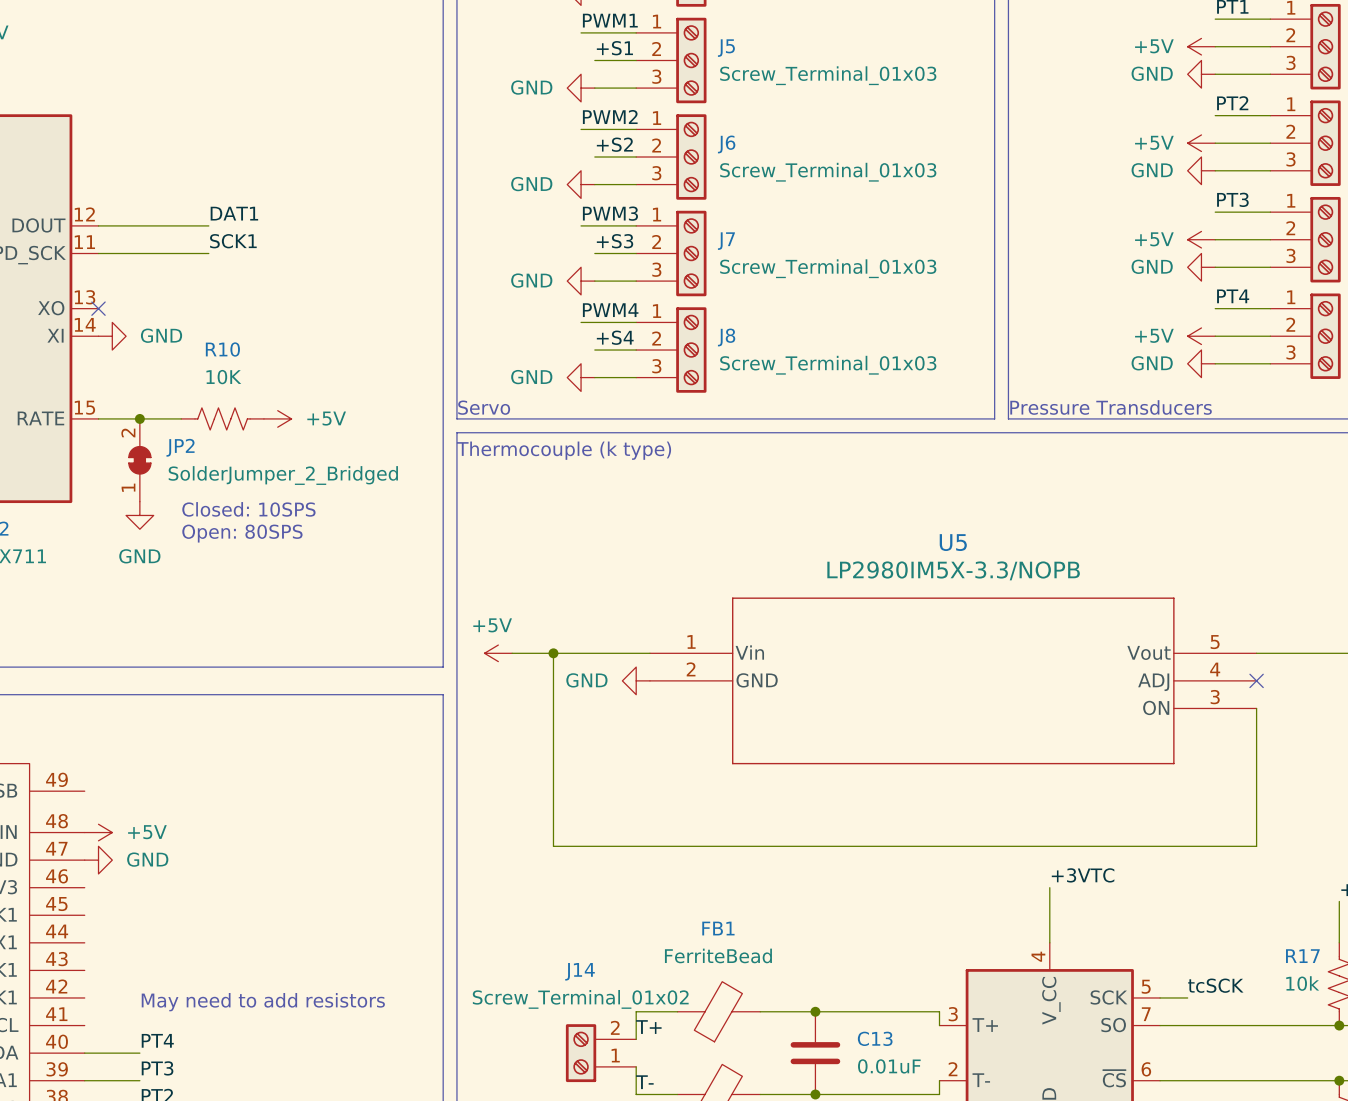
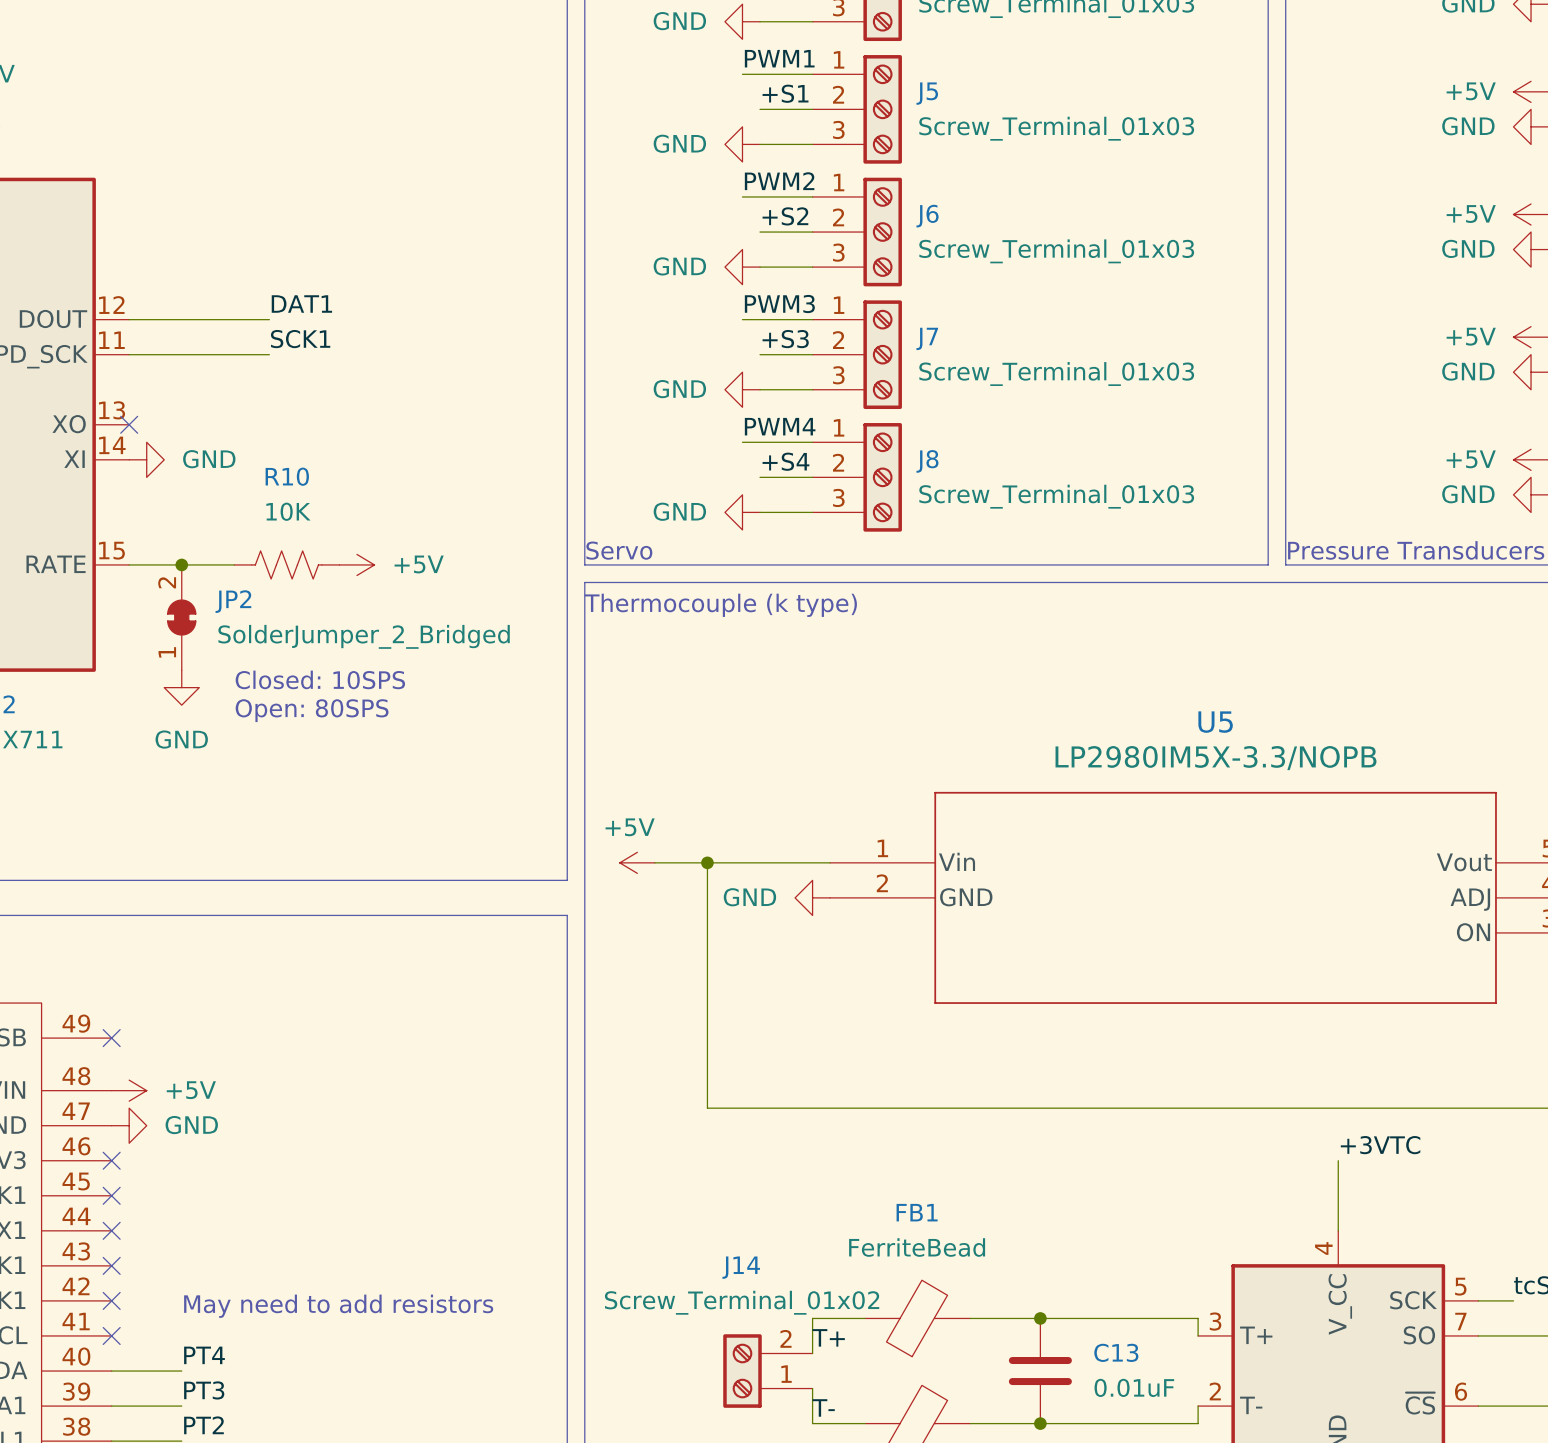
no-connect mark: none -> (111, 1038)
no-connect mark: none -> (111, 1160)
no-connect mark: none -> (111, 1195)
no-connect mark: none -> (111, 1230)
no-connect mark: none -> (111, 1265)
no-connect mark: none -> (111, 1300)
no-connect mark: none -> (111, 1335)

